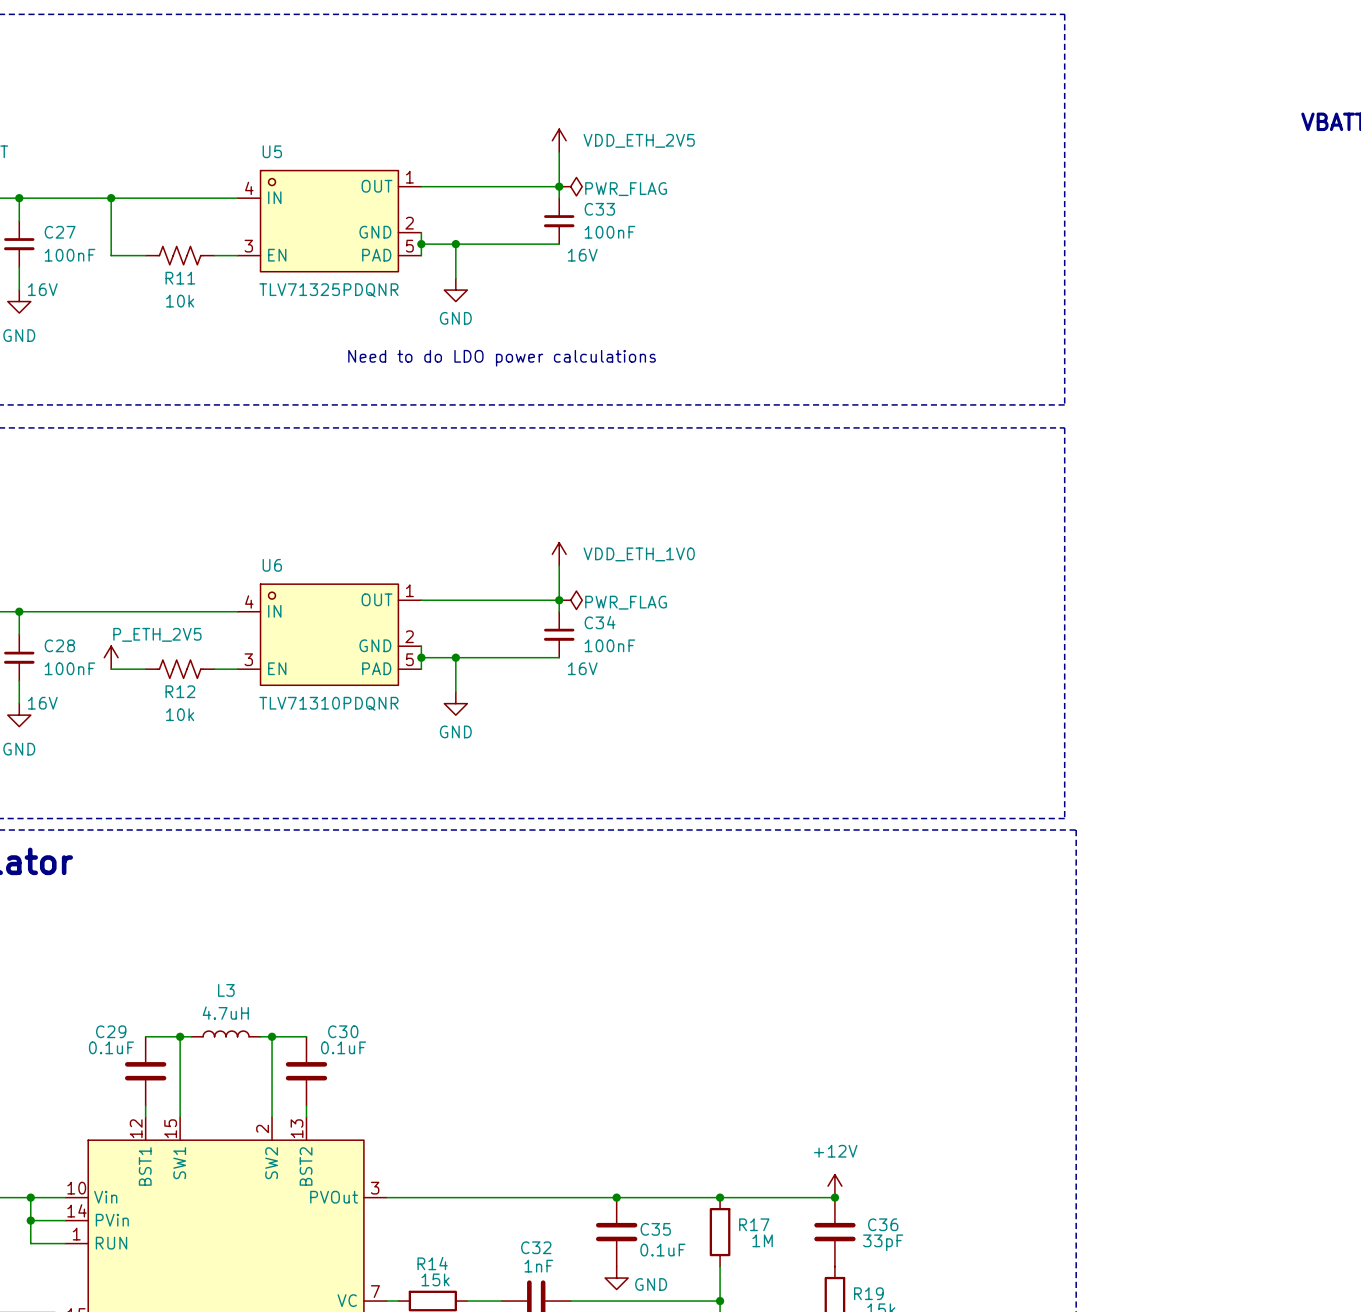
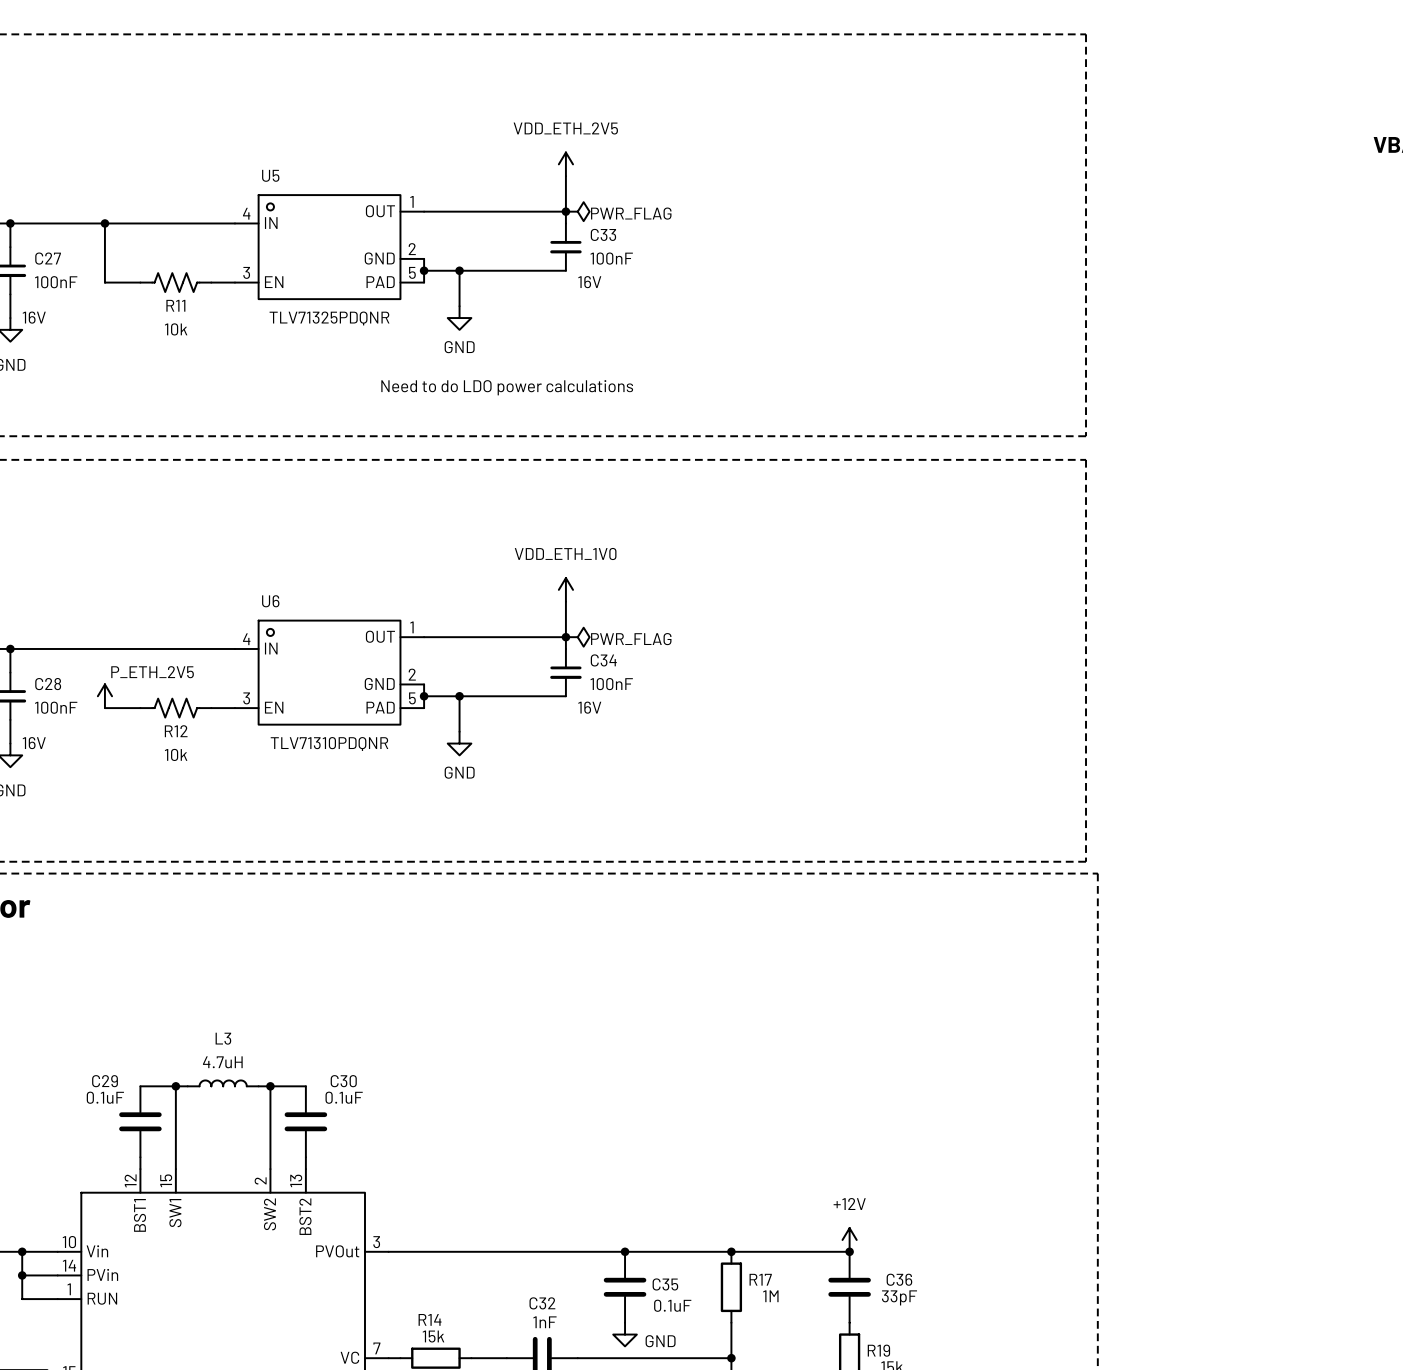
power symbol text position: VDD_ETH_2V5 (639, 140) -> VDD_ETH_2V5 (565, 128)
power symbol text position: VDD_ETH_1V0 (639, 554) -> VDD_ETH_1V0 (565, 554)

